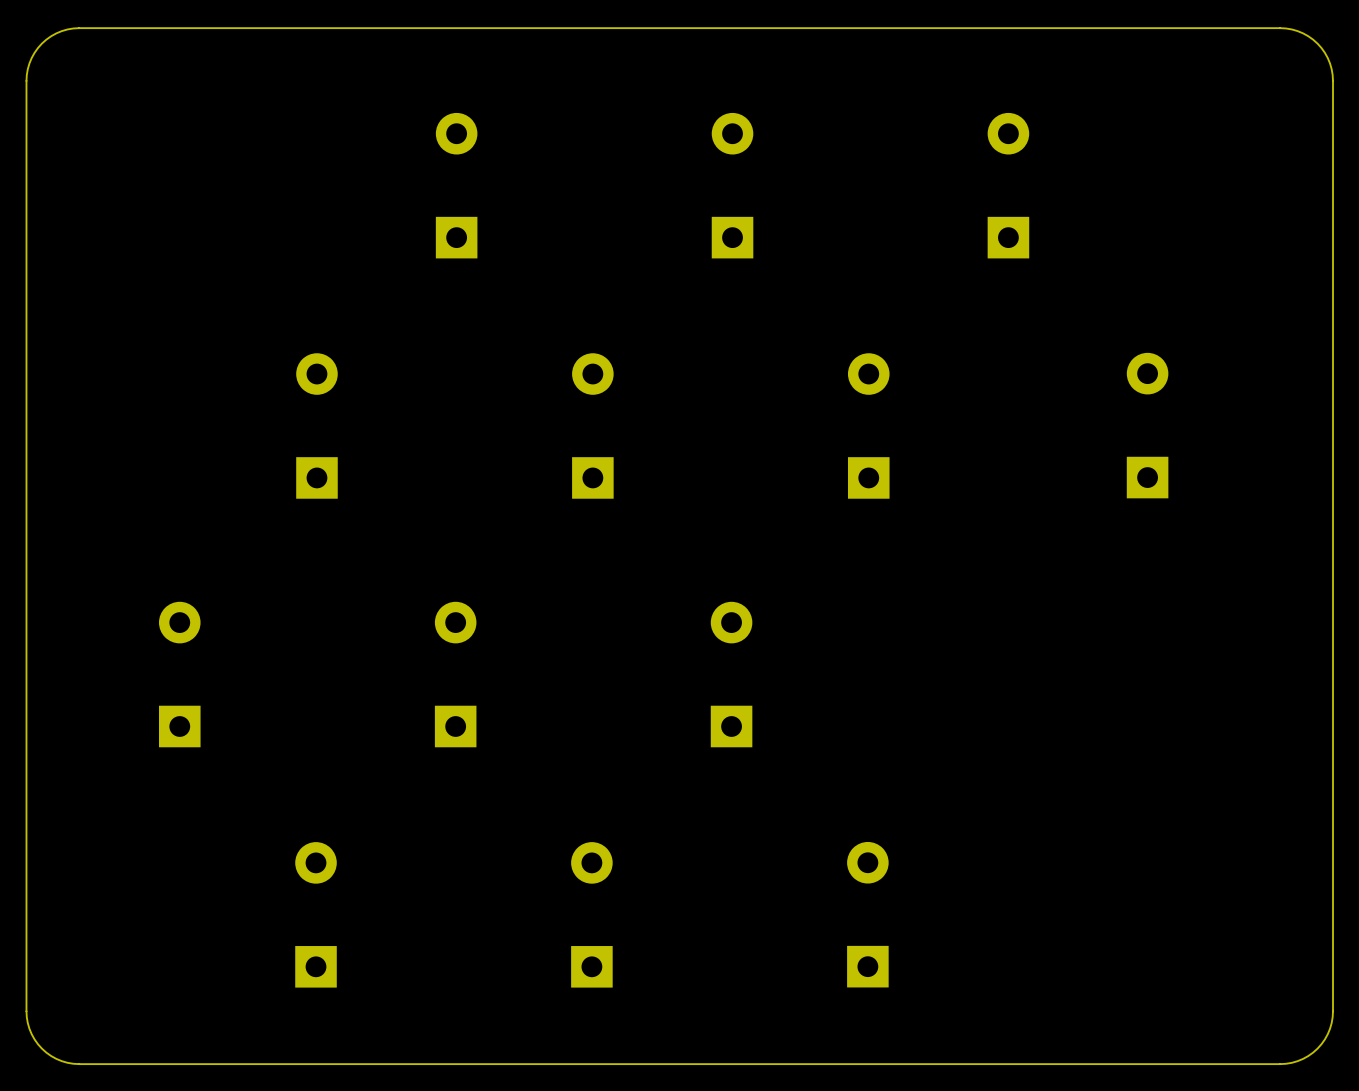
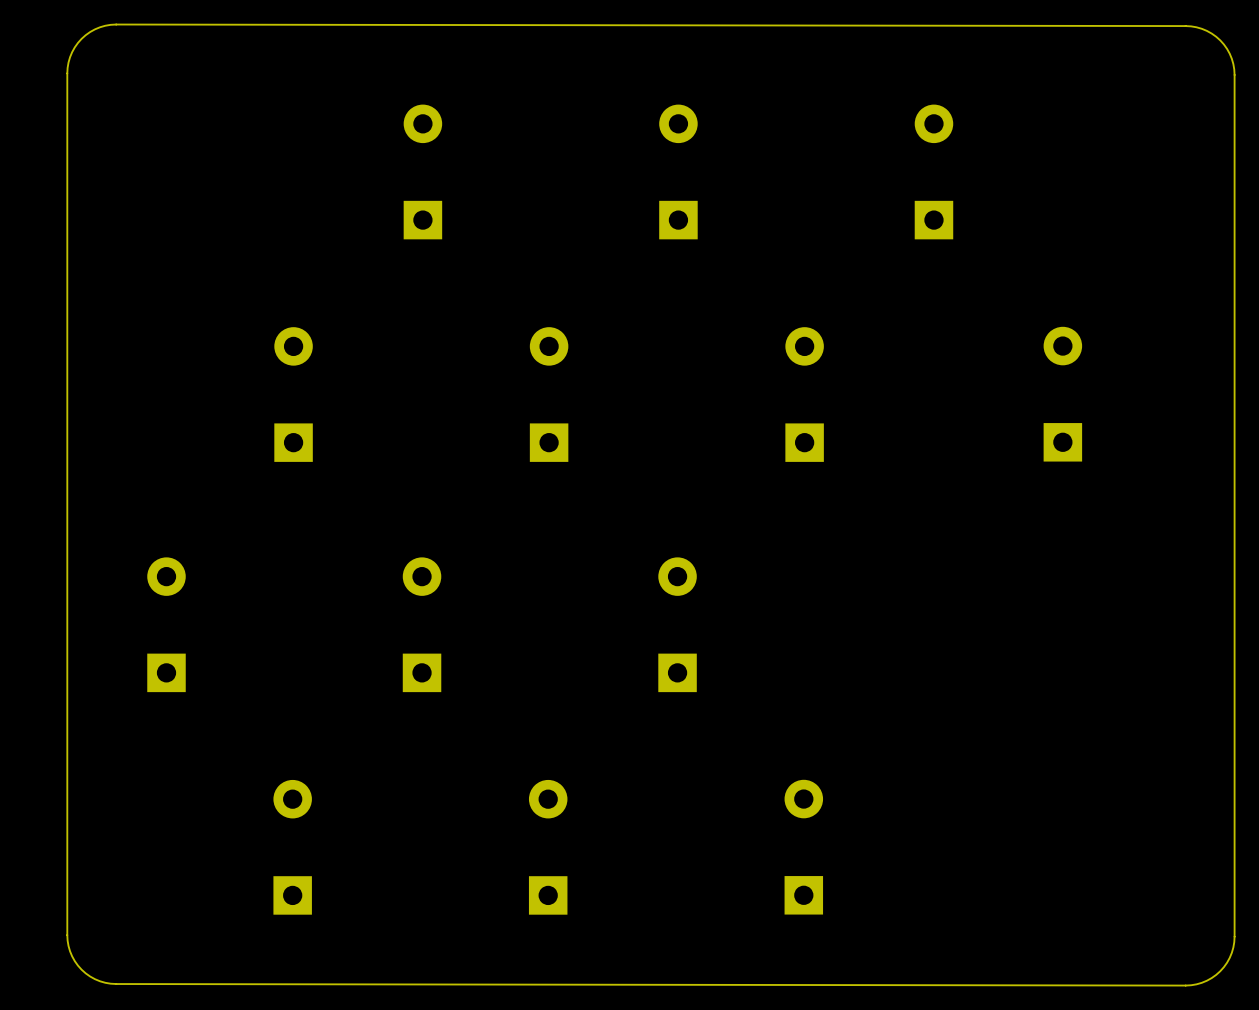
board edge: (1280, 28) (79, 28) (61, 31) (41, 43) (29, 63) (26, 80) (26, 1011) (31, 1034) (46, 1052) (61, 1061) (79, 1064) (1280, 1064) -> (1185, 26) (116, 24) (100, 27) (81, 38) (72, 52) (67, 73) (67, 935) (72, 956) (85, 973) (100, 981) (116, 984) (1185, 985)

